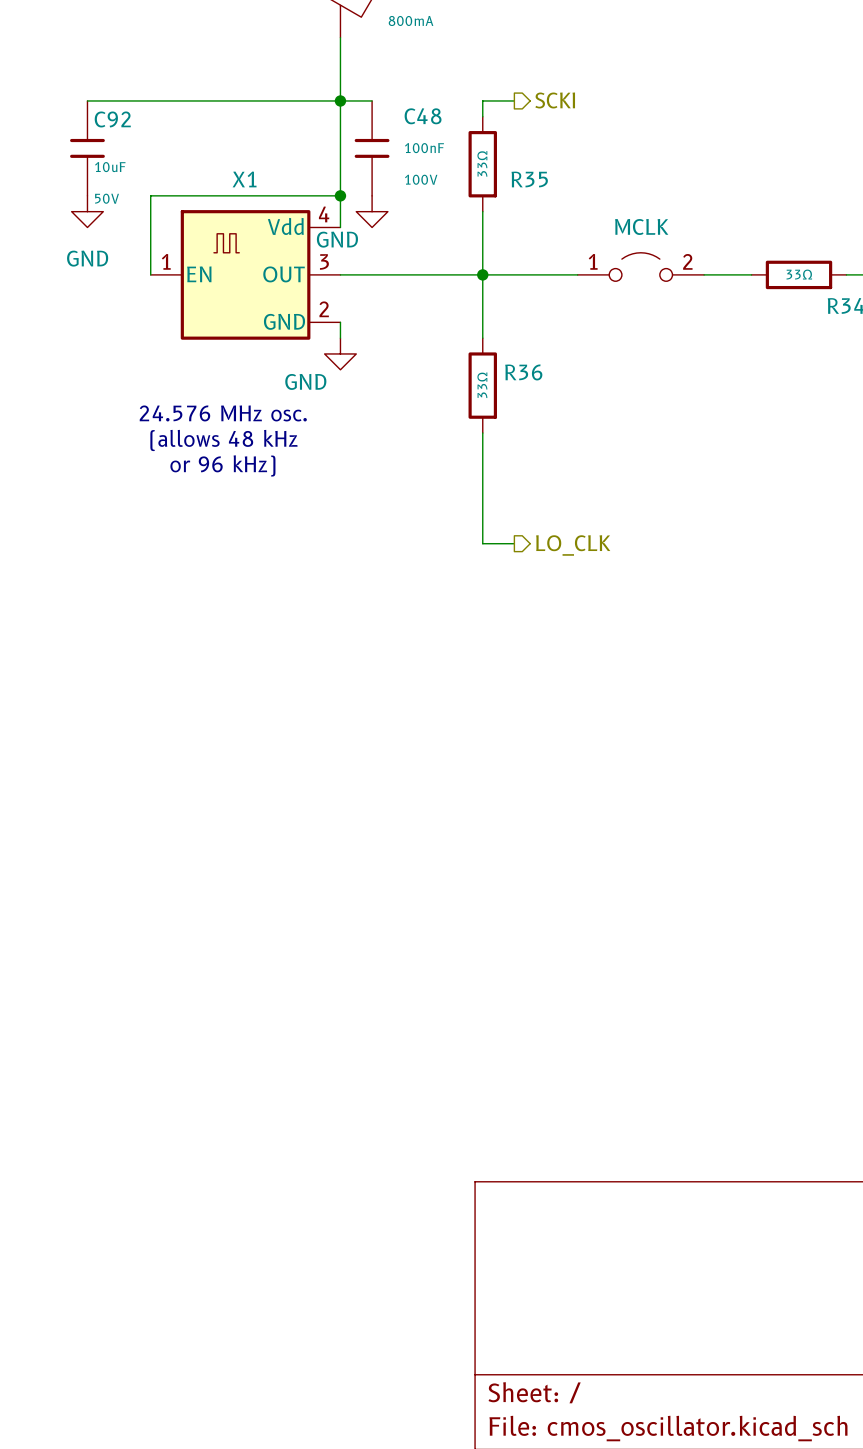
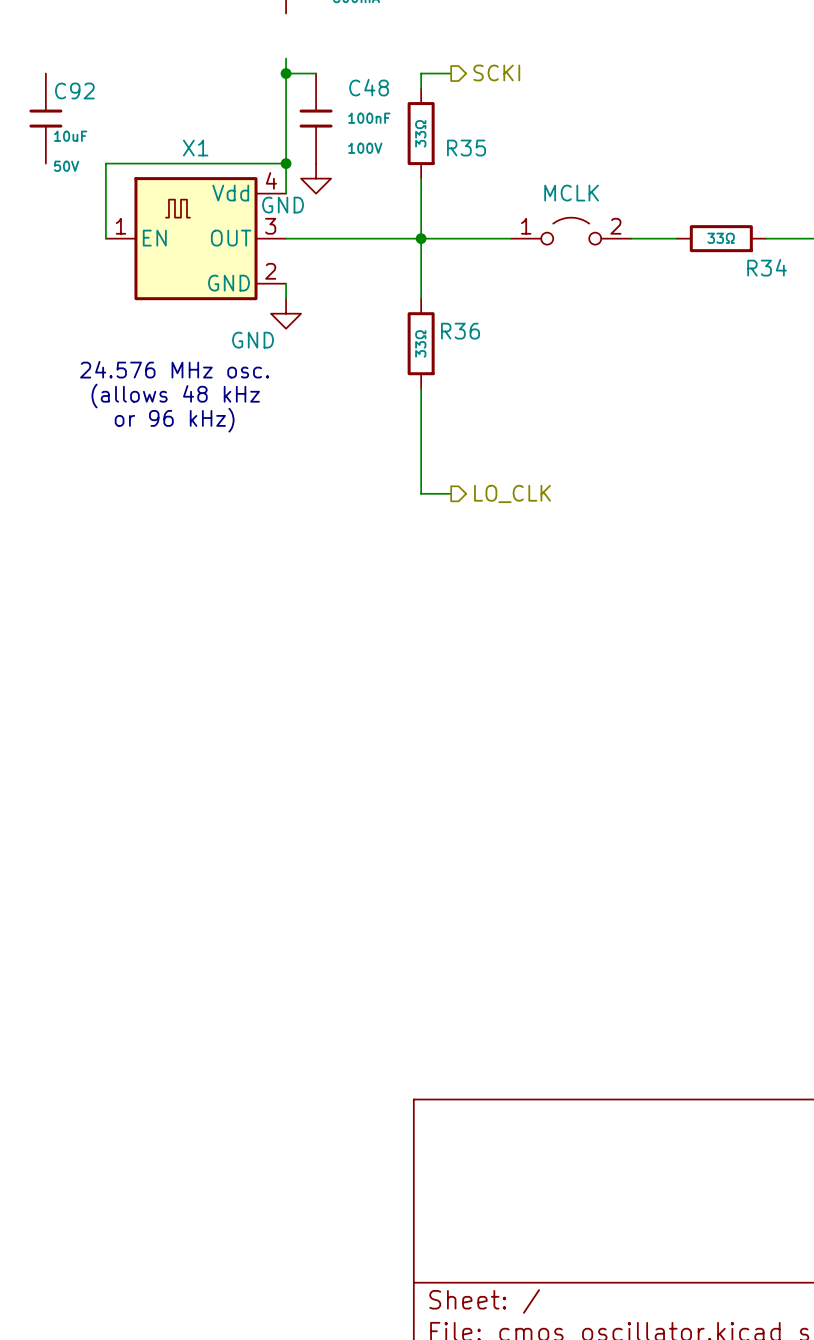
wire: (340, 37) (340, 85) -> none
wire: (87, 100) (340, 100) -> none
power symbol: GND (87, 211) -> none

